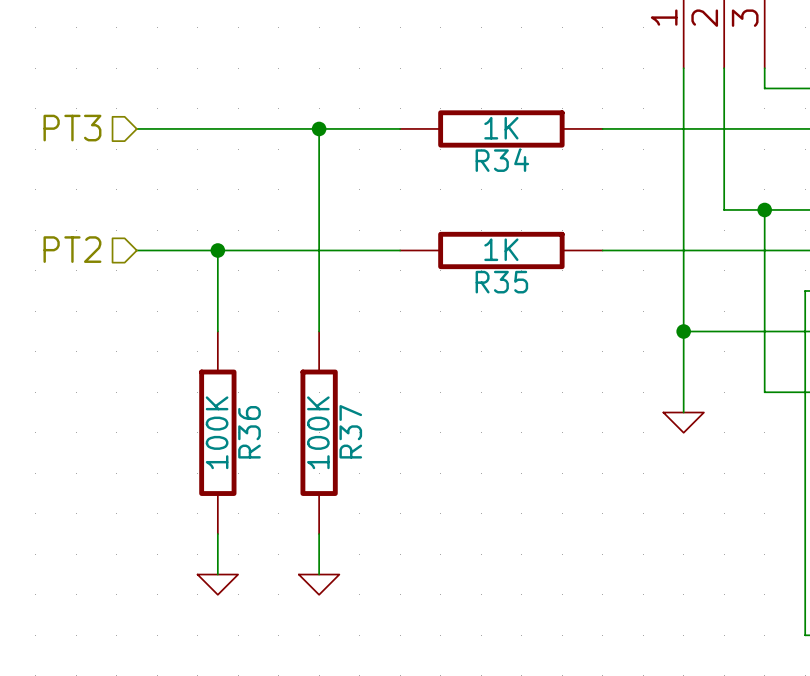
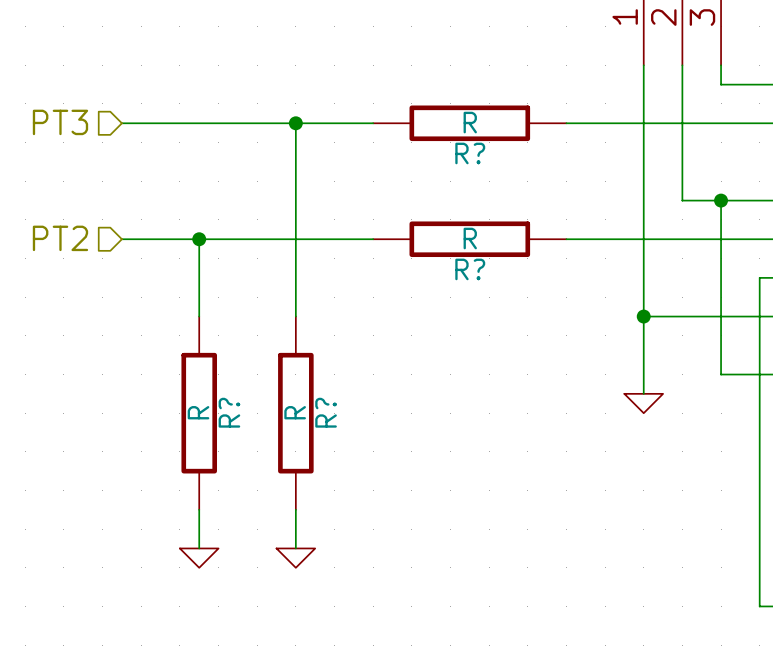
R34 value: 1K (501, 128) -> R (470, 122)
R34 name: R34 (502, 160) -> R? (470, 153)
R35 value: 1K (501, 249) -> R (470, 238)
R35 name: R35 (501, 282) -> R? (470, 269)
R37 name: R37 (350, 431) -> R? (326, 412)
R36 value: 100K (217, 432) -> R (198, 412)
R36 name: R36 (249, 432) -> R? (229, 412)
R37 value: 100K (318, 432) -> R (295, 412)

